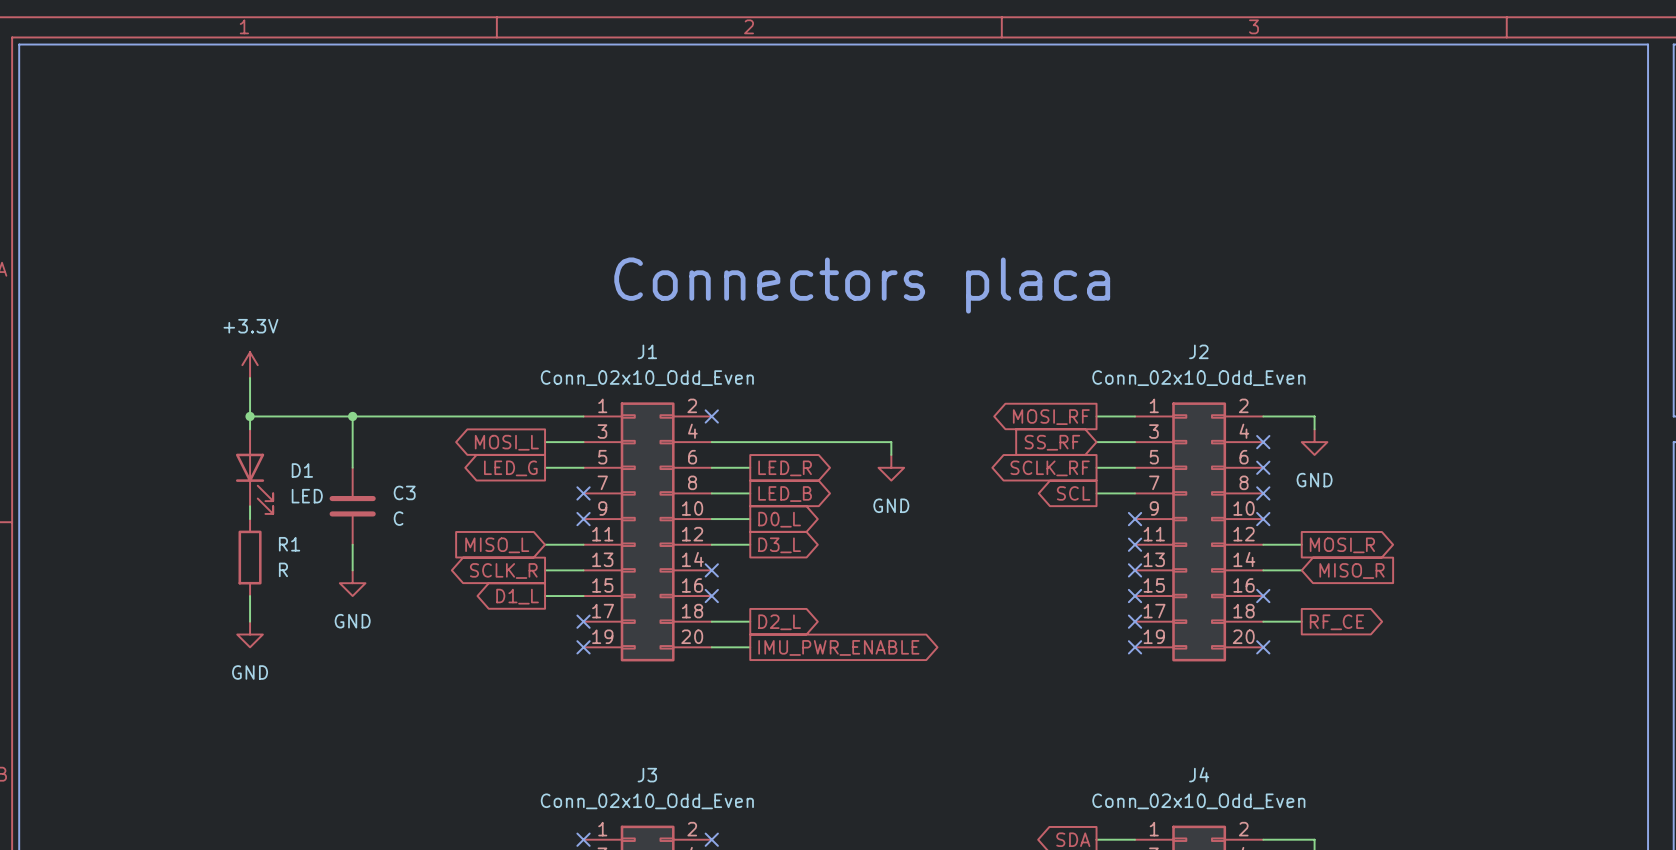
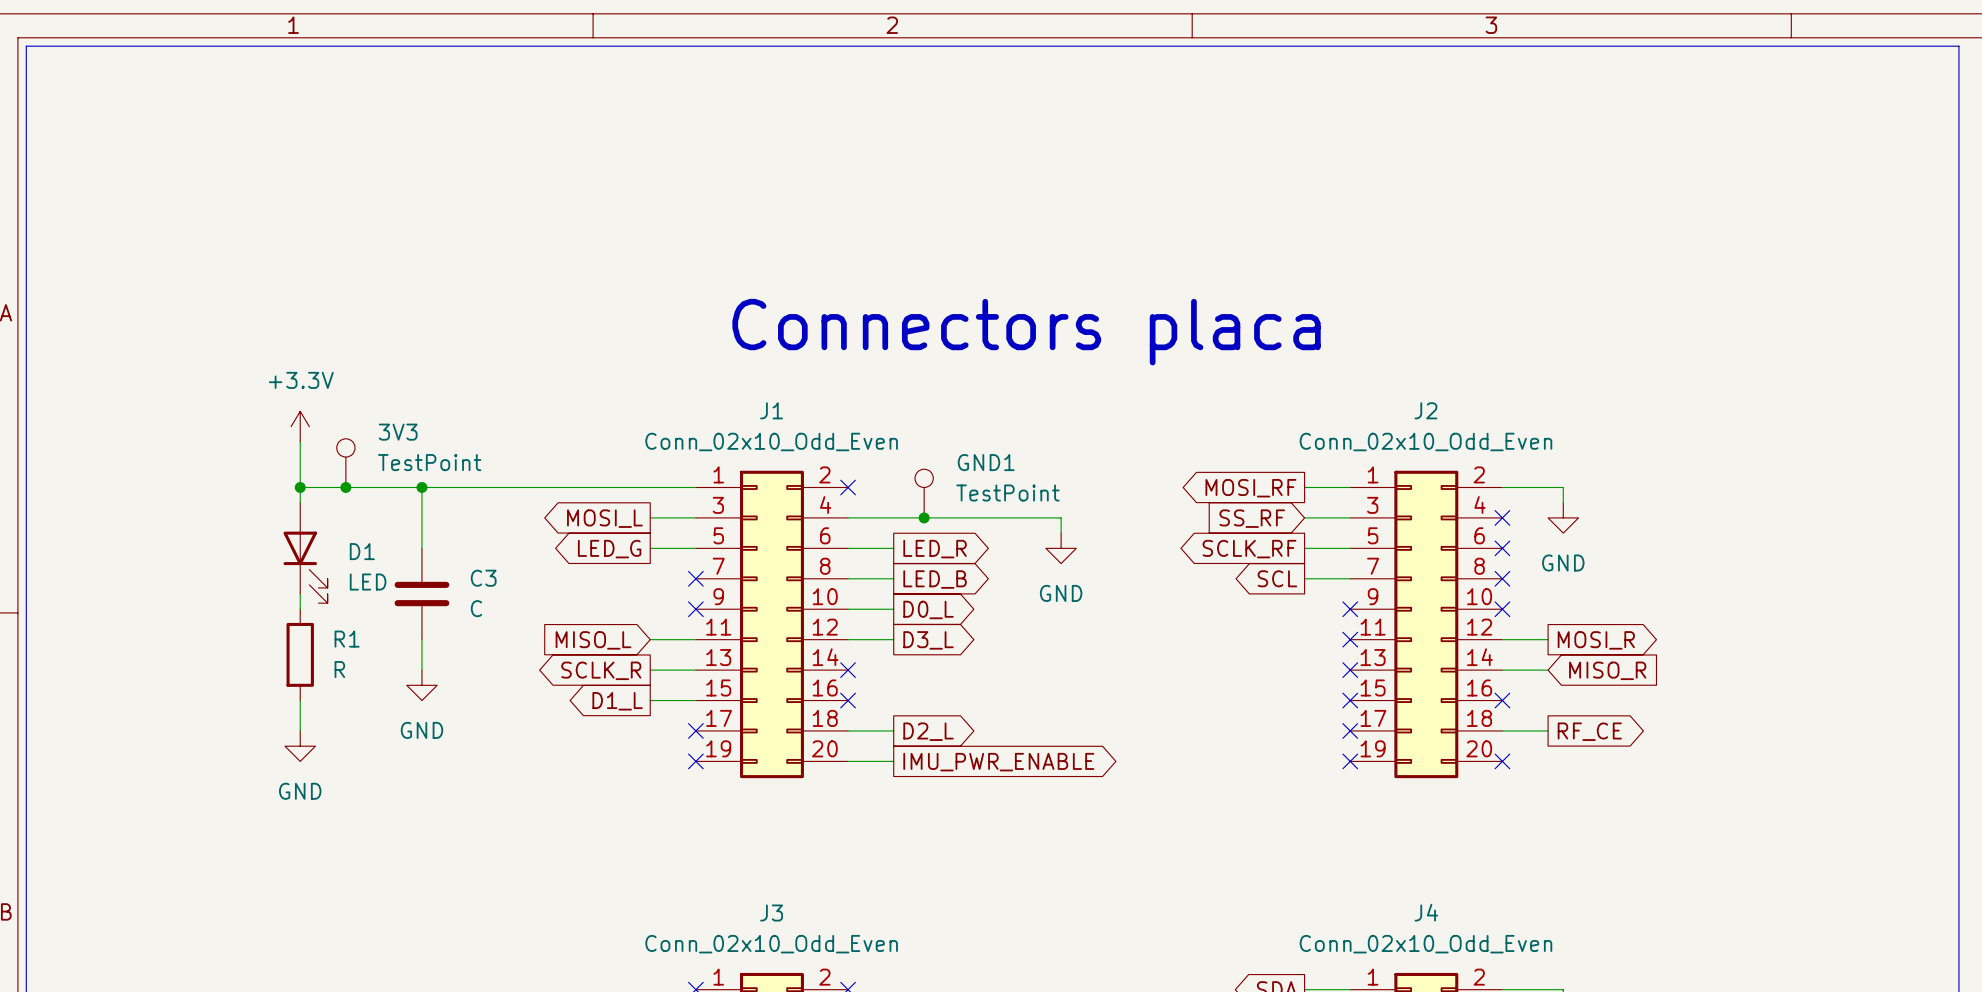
3V3: none -> TestPoint (345, 463)
junction: none -> (345, 487)
GND1: none -> TestPoint (924, 493)
junction: none -> (924, 517)

